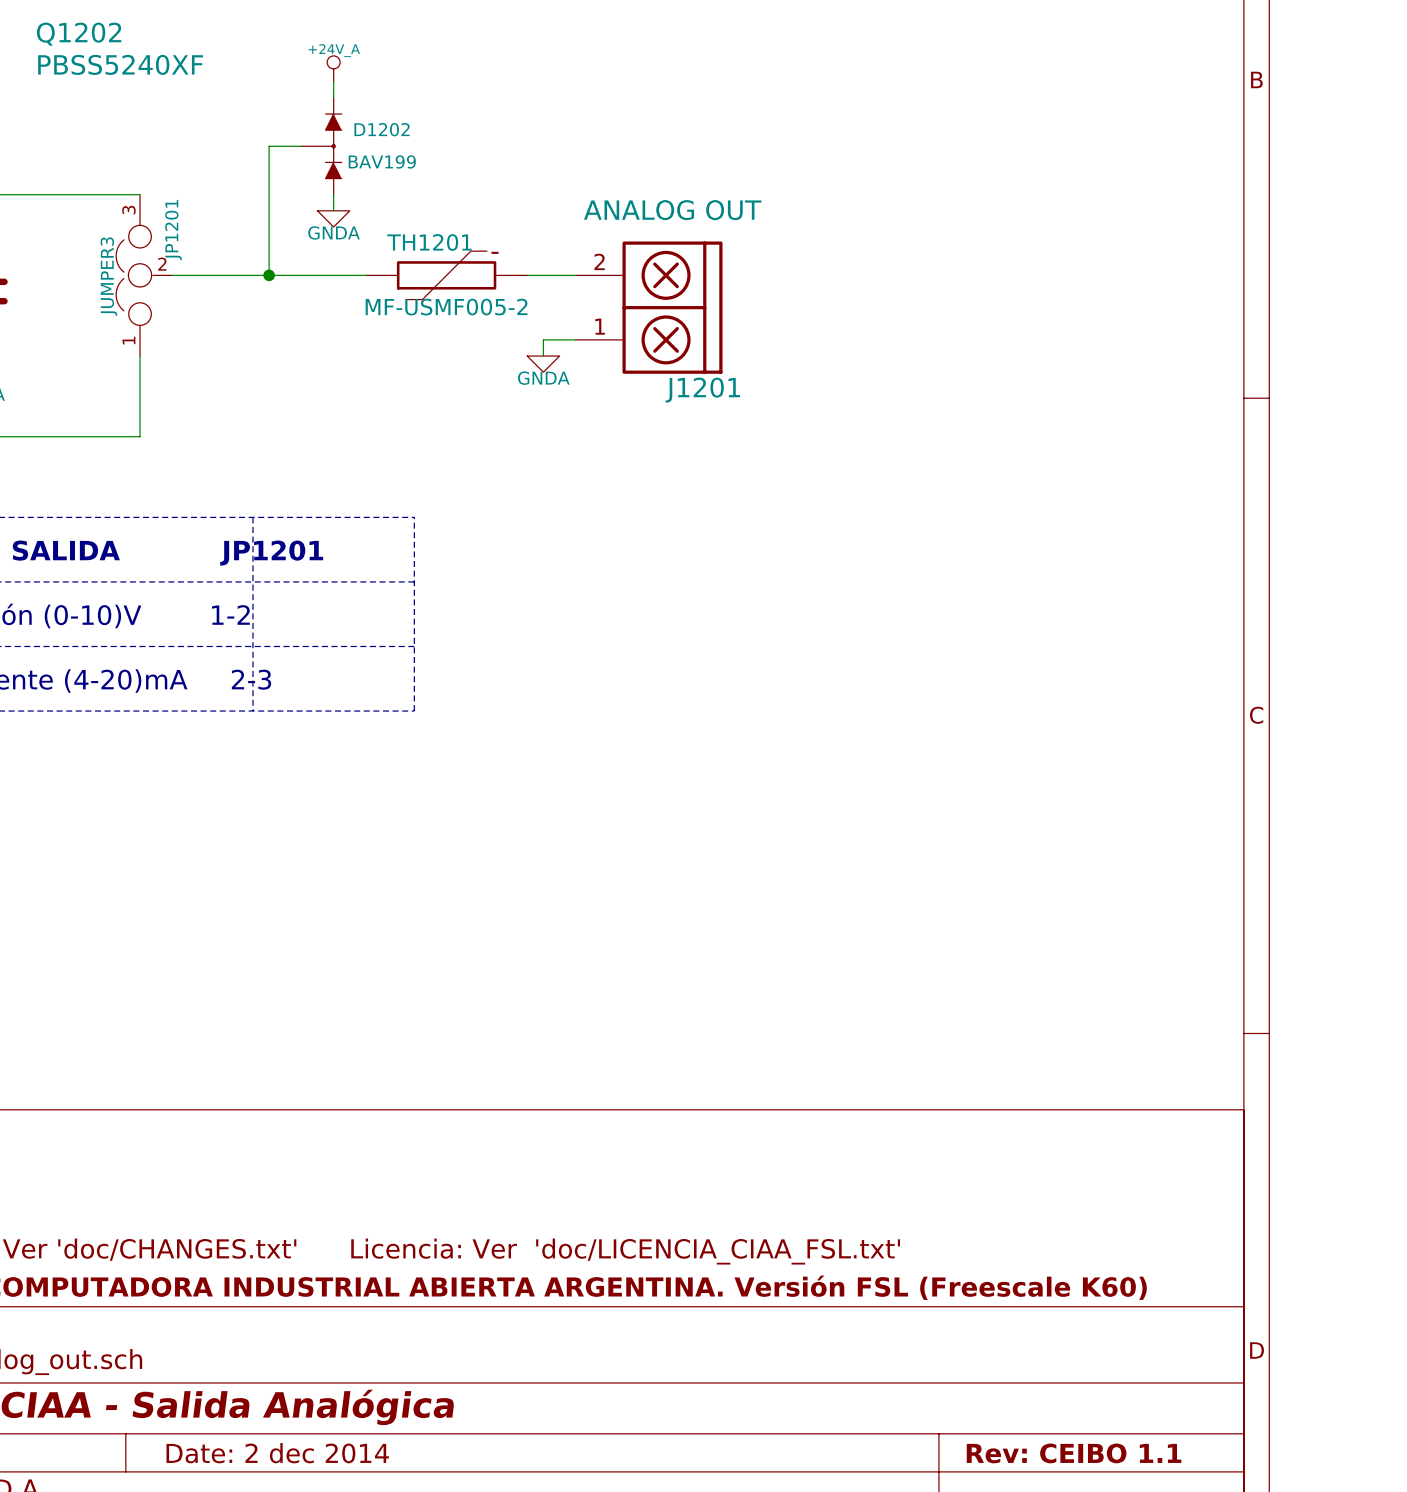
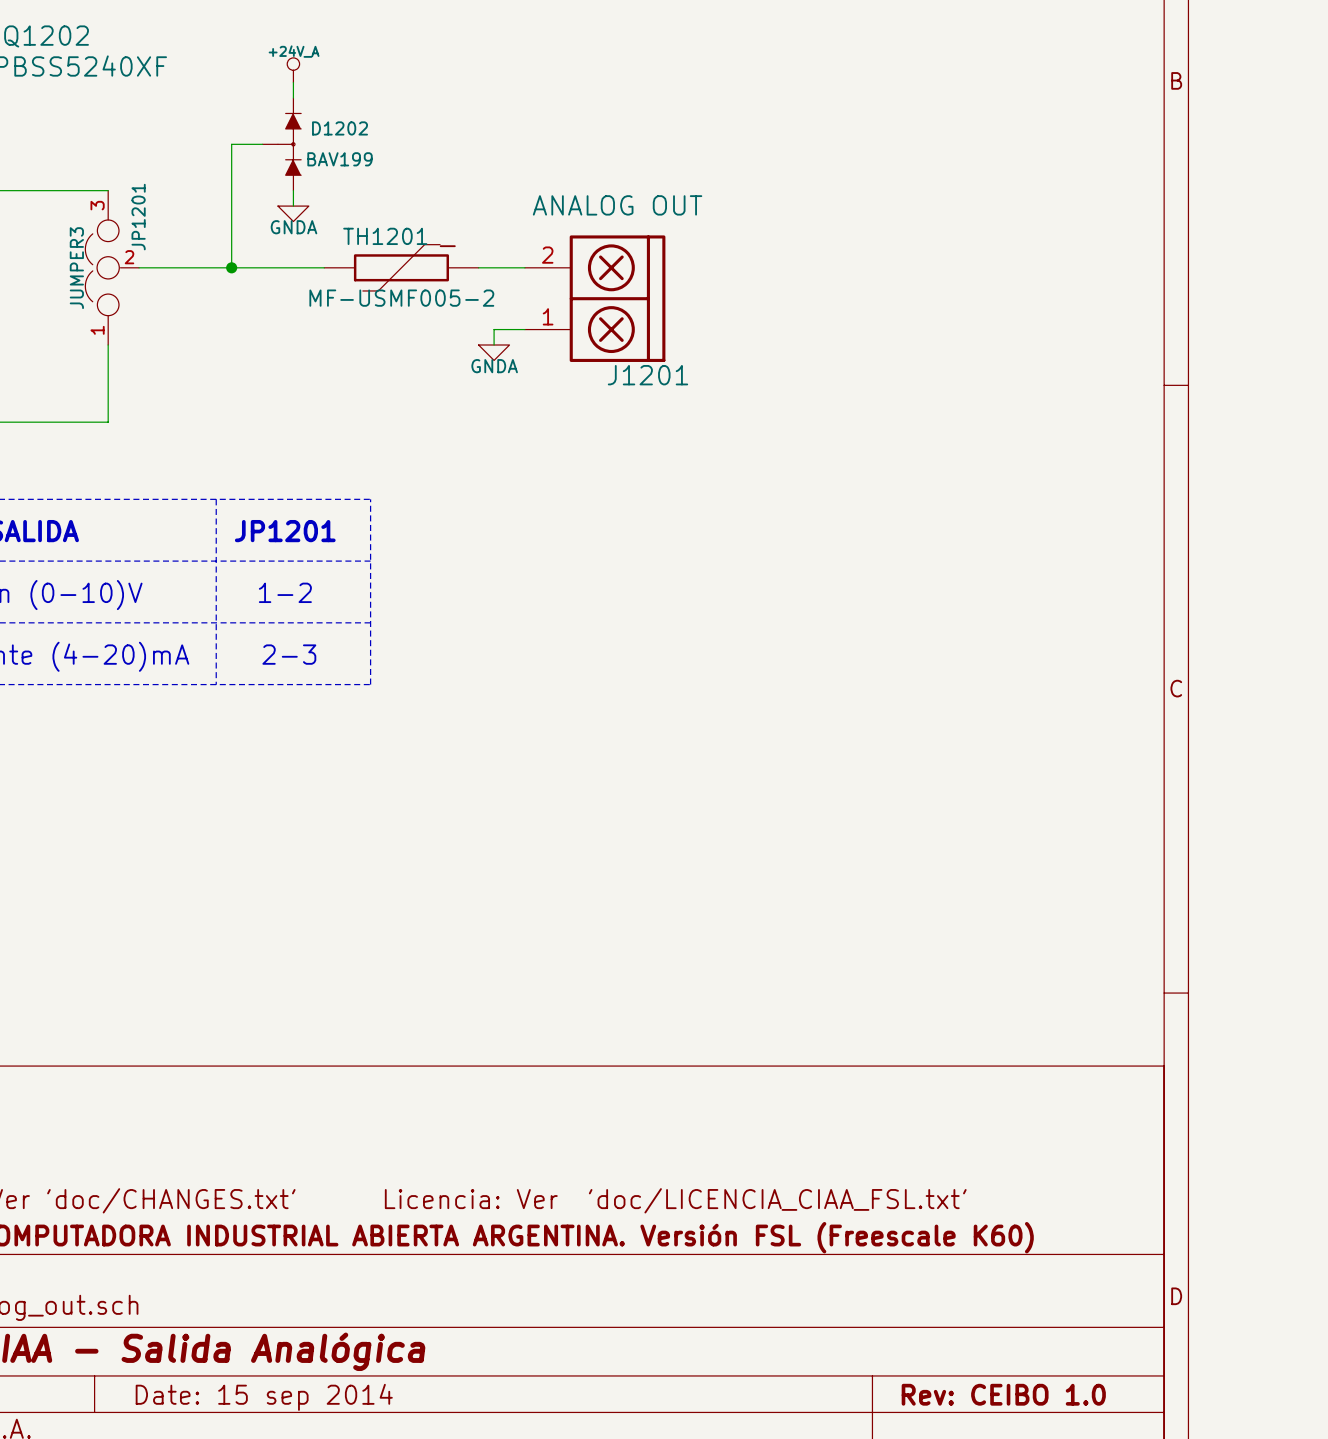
title block: Date: 2 dec 2014 (277, 1453) -> Date: 15 sep 2014 (264, 1397)
title block: Rev: CEIBO 1.1 (1074, 1453) -> Rev: CEIBO 1.0 (1003, 1394)

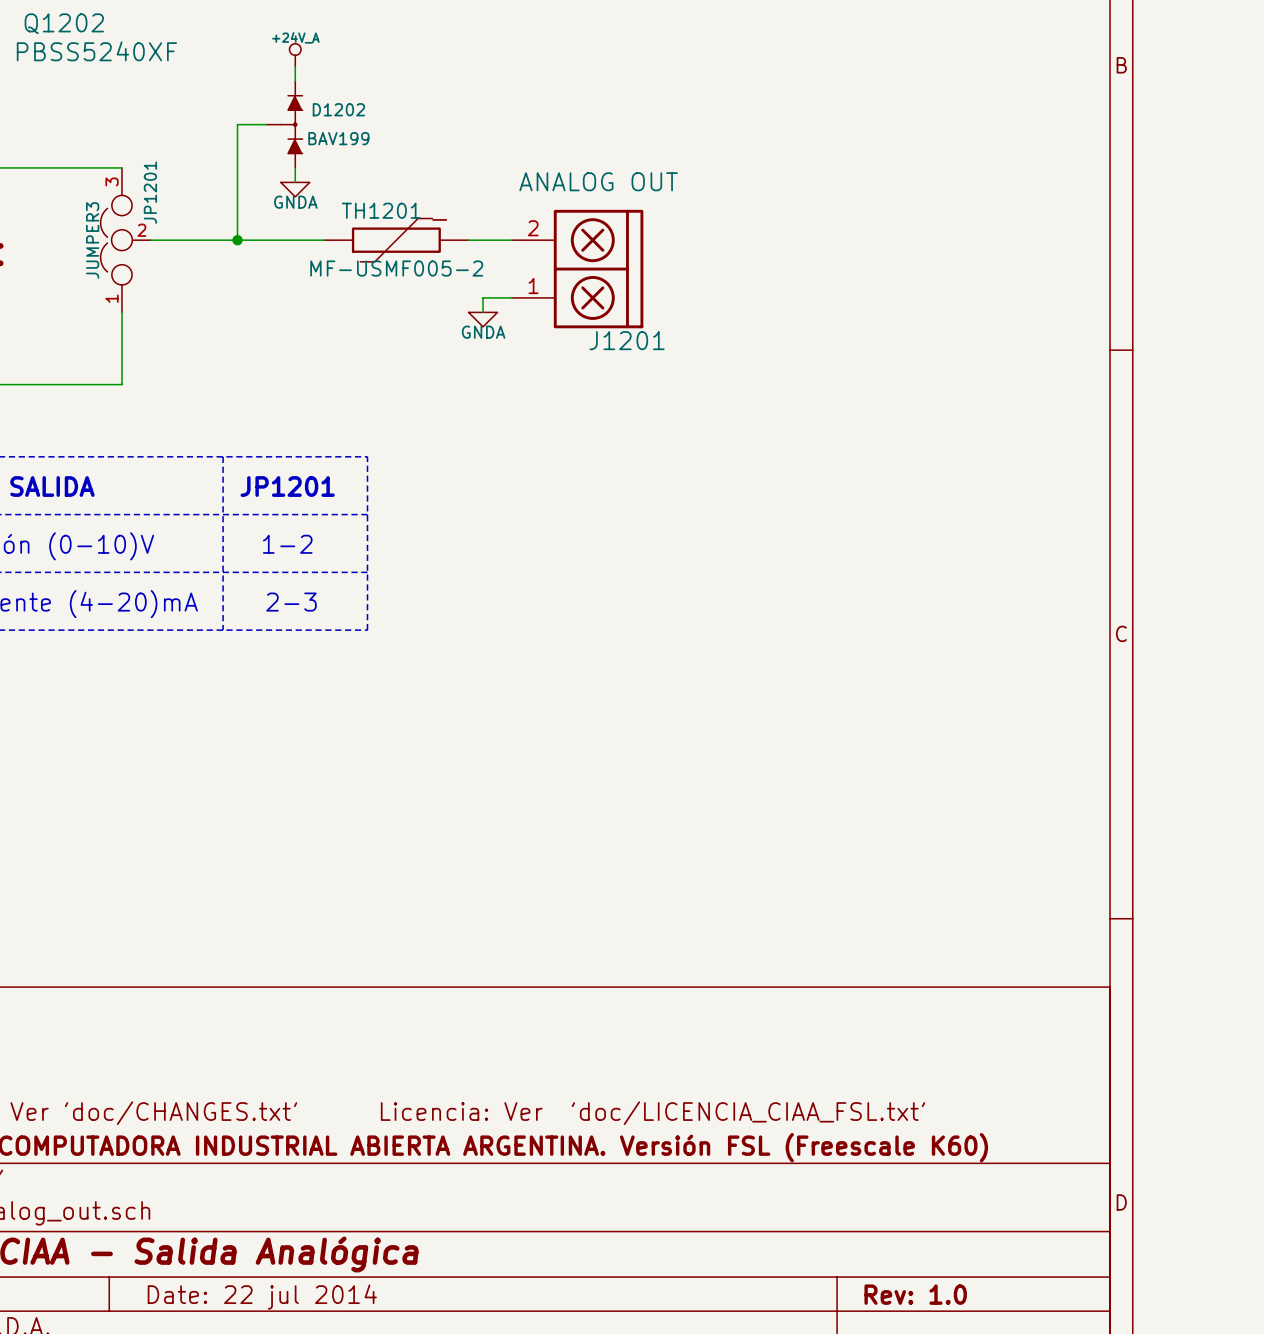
title block: Rev: CEIBO 1.0 (1003, 1394) -> Rev: 1.0 (915, 1294)
title block: Date: 15 sep 2014 (264, 1397) -> Date: 22 jul 2014 (262, 1297)

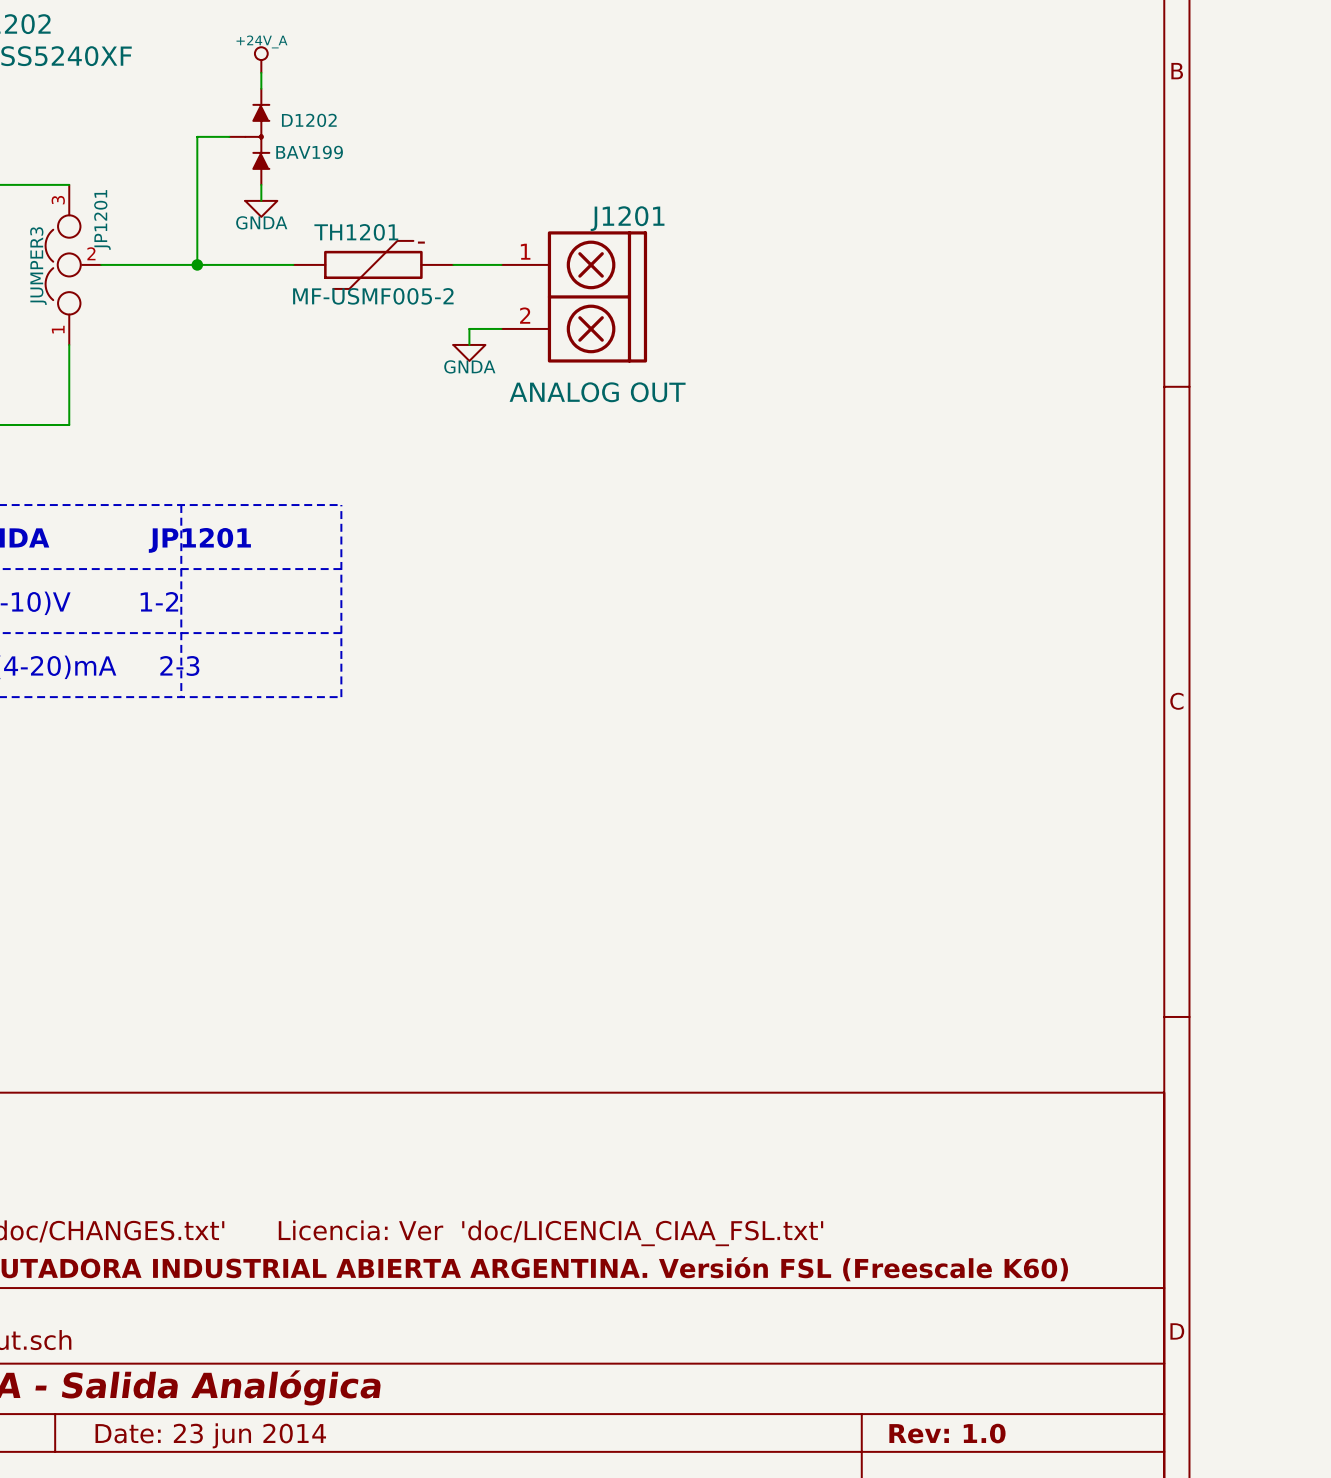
J1201 flip: as is (598, 269) -> up-down (597, 296)
title block: Date: 22 jul 2014 (262, 1297) -> Date: 23 jun 2014 (210, 1435)

